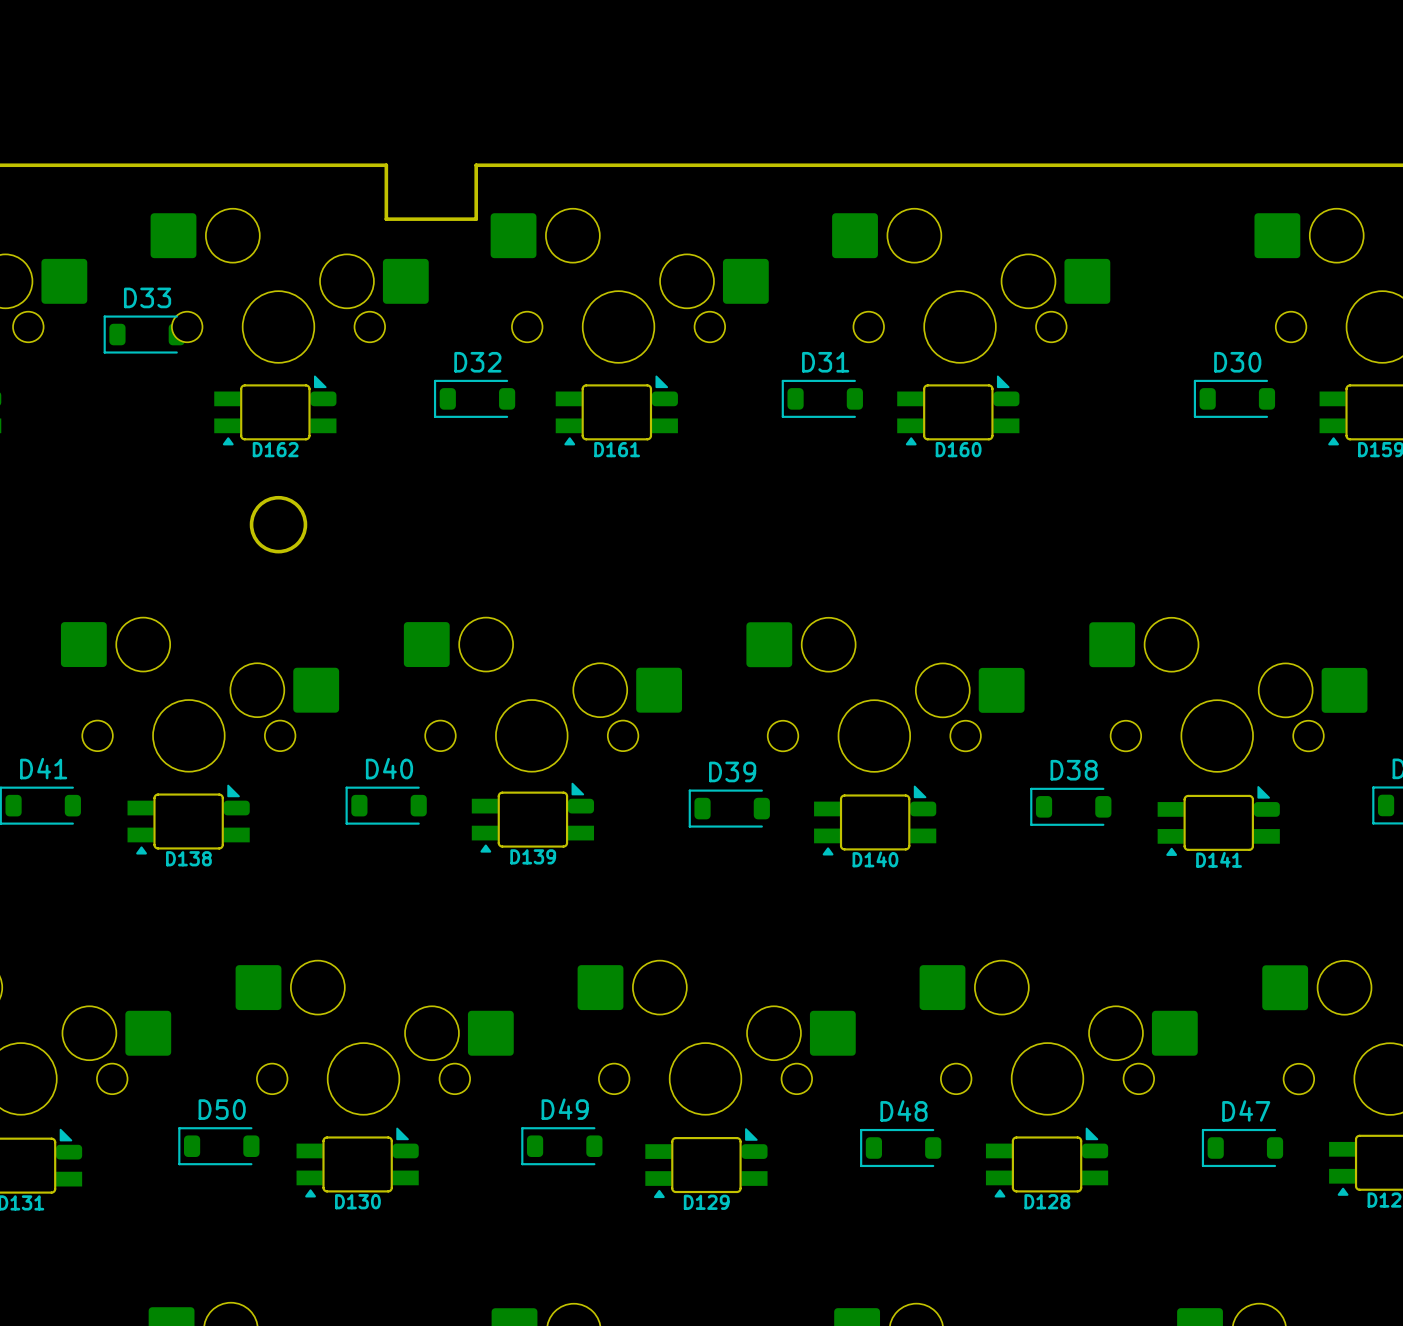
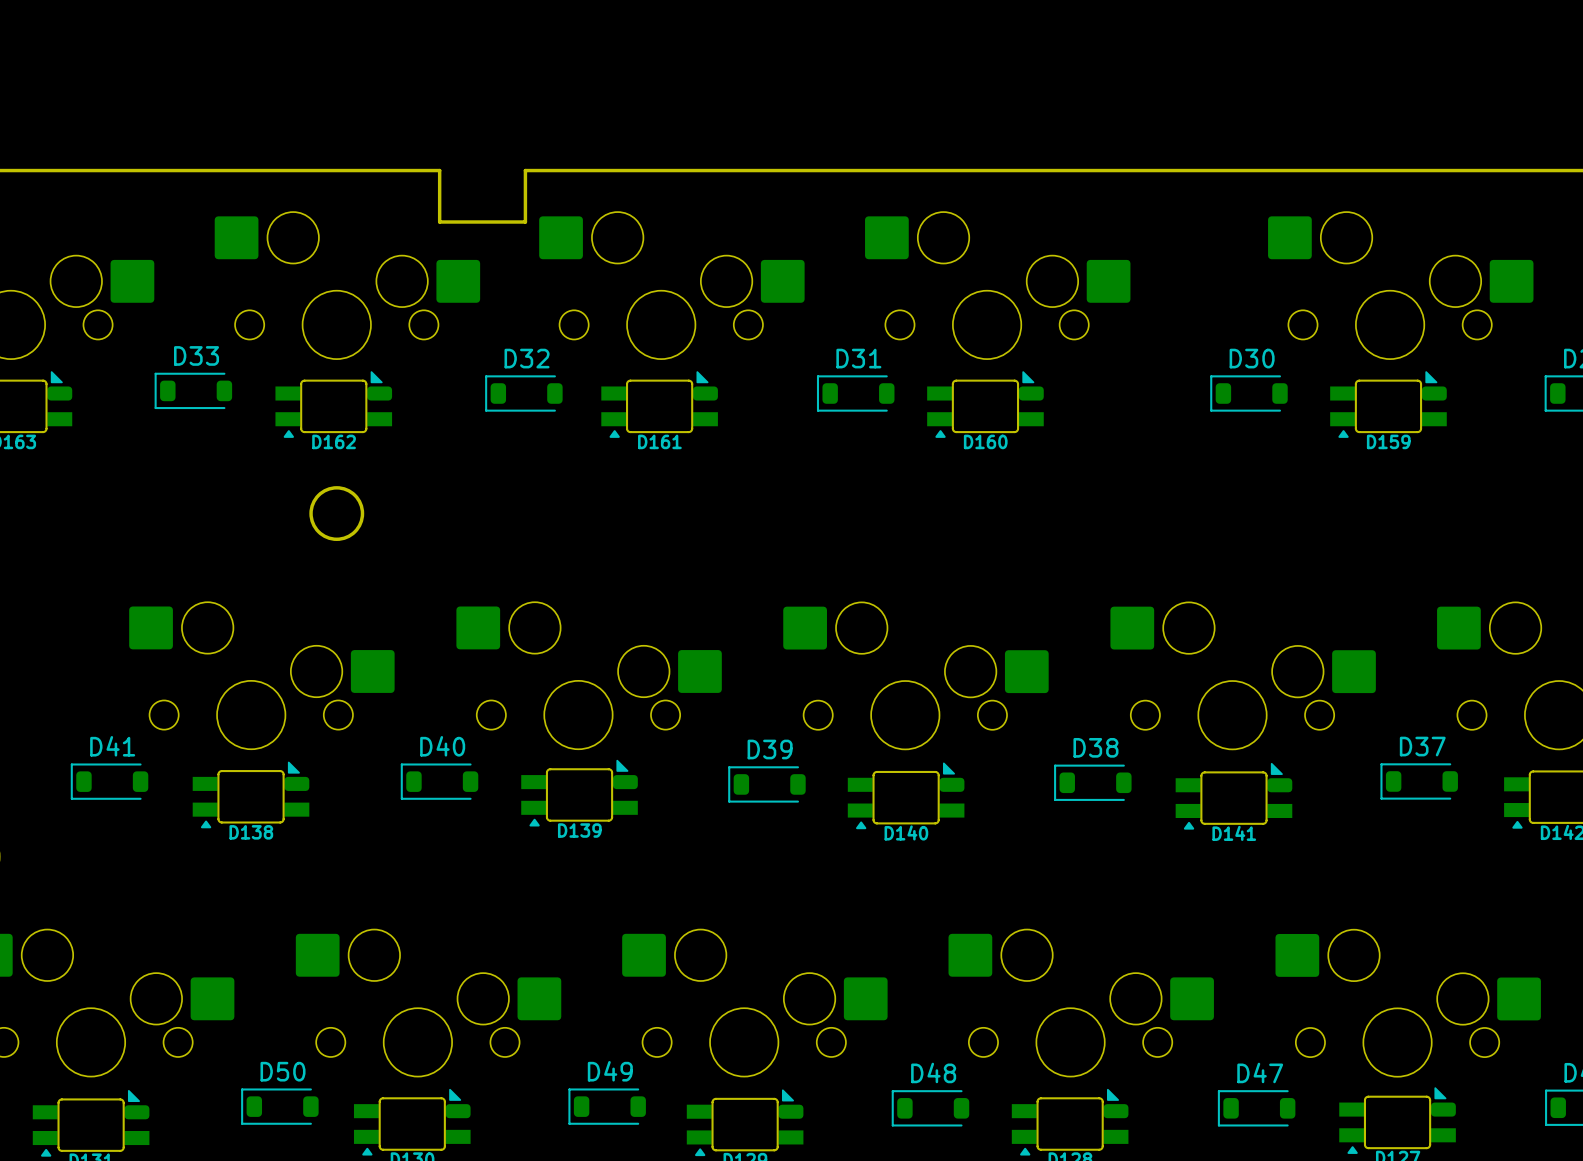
D33 position: (144, 334) -> (193, 390)

